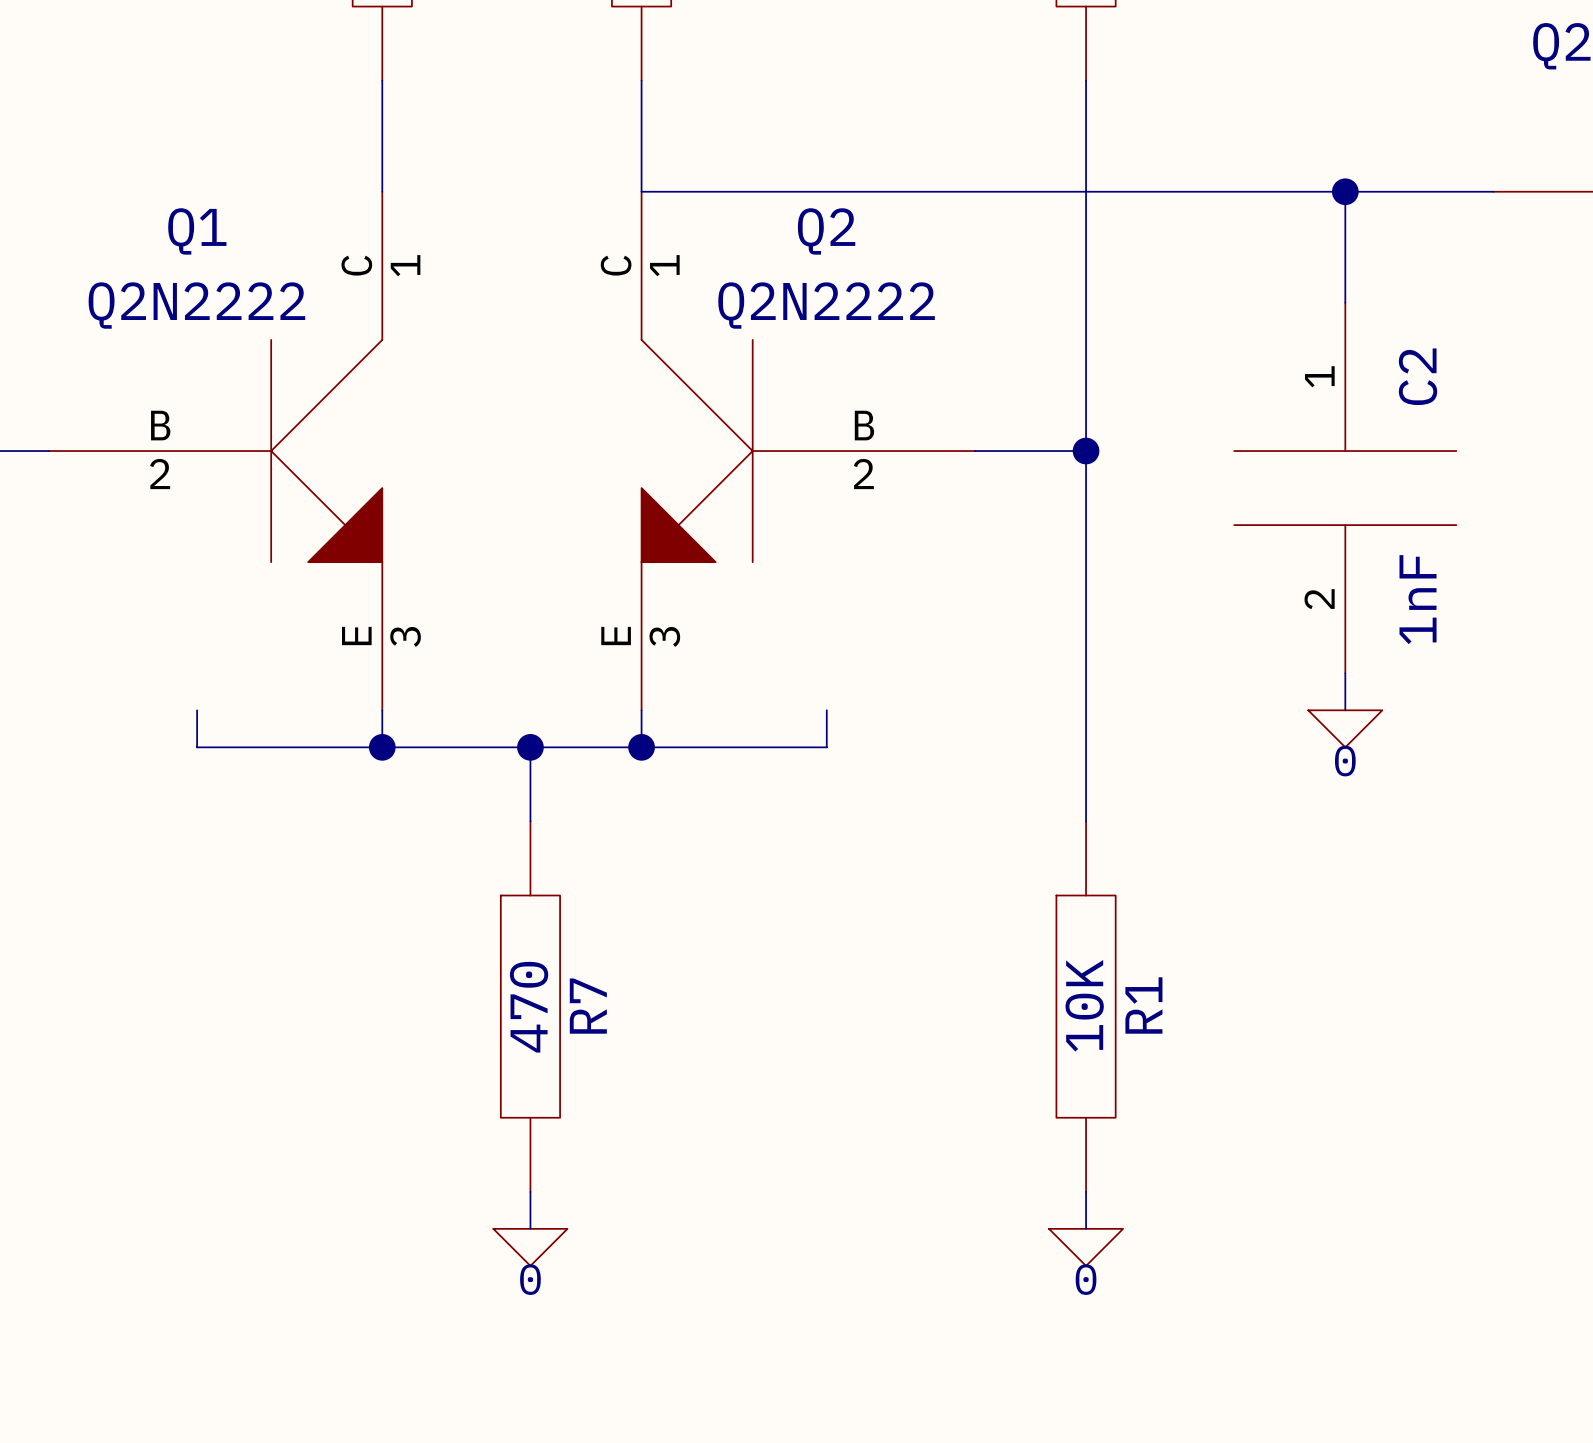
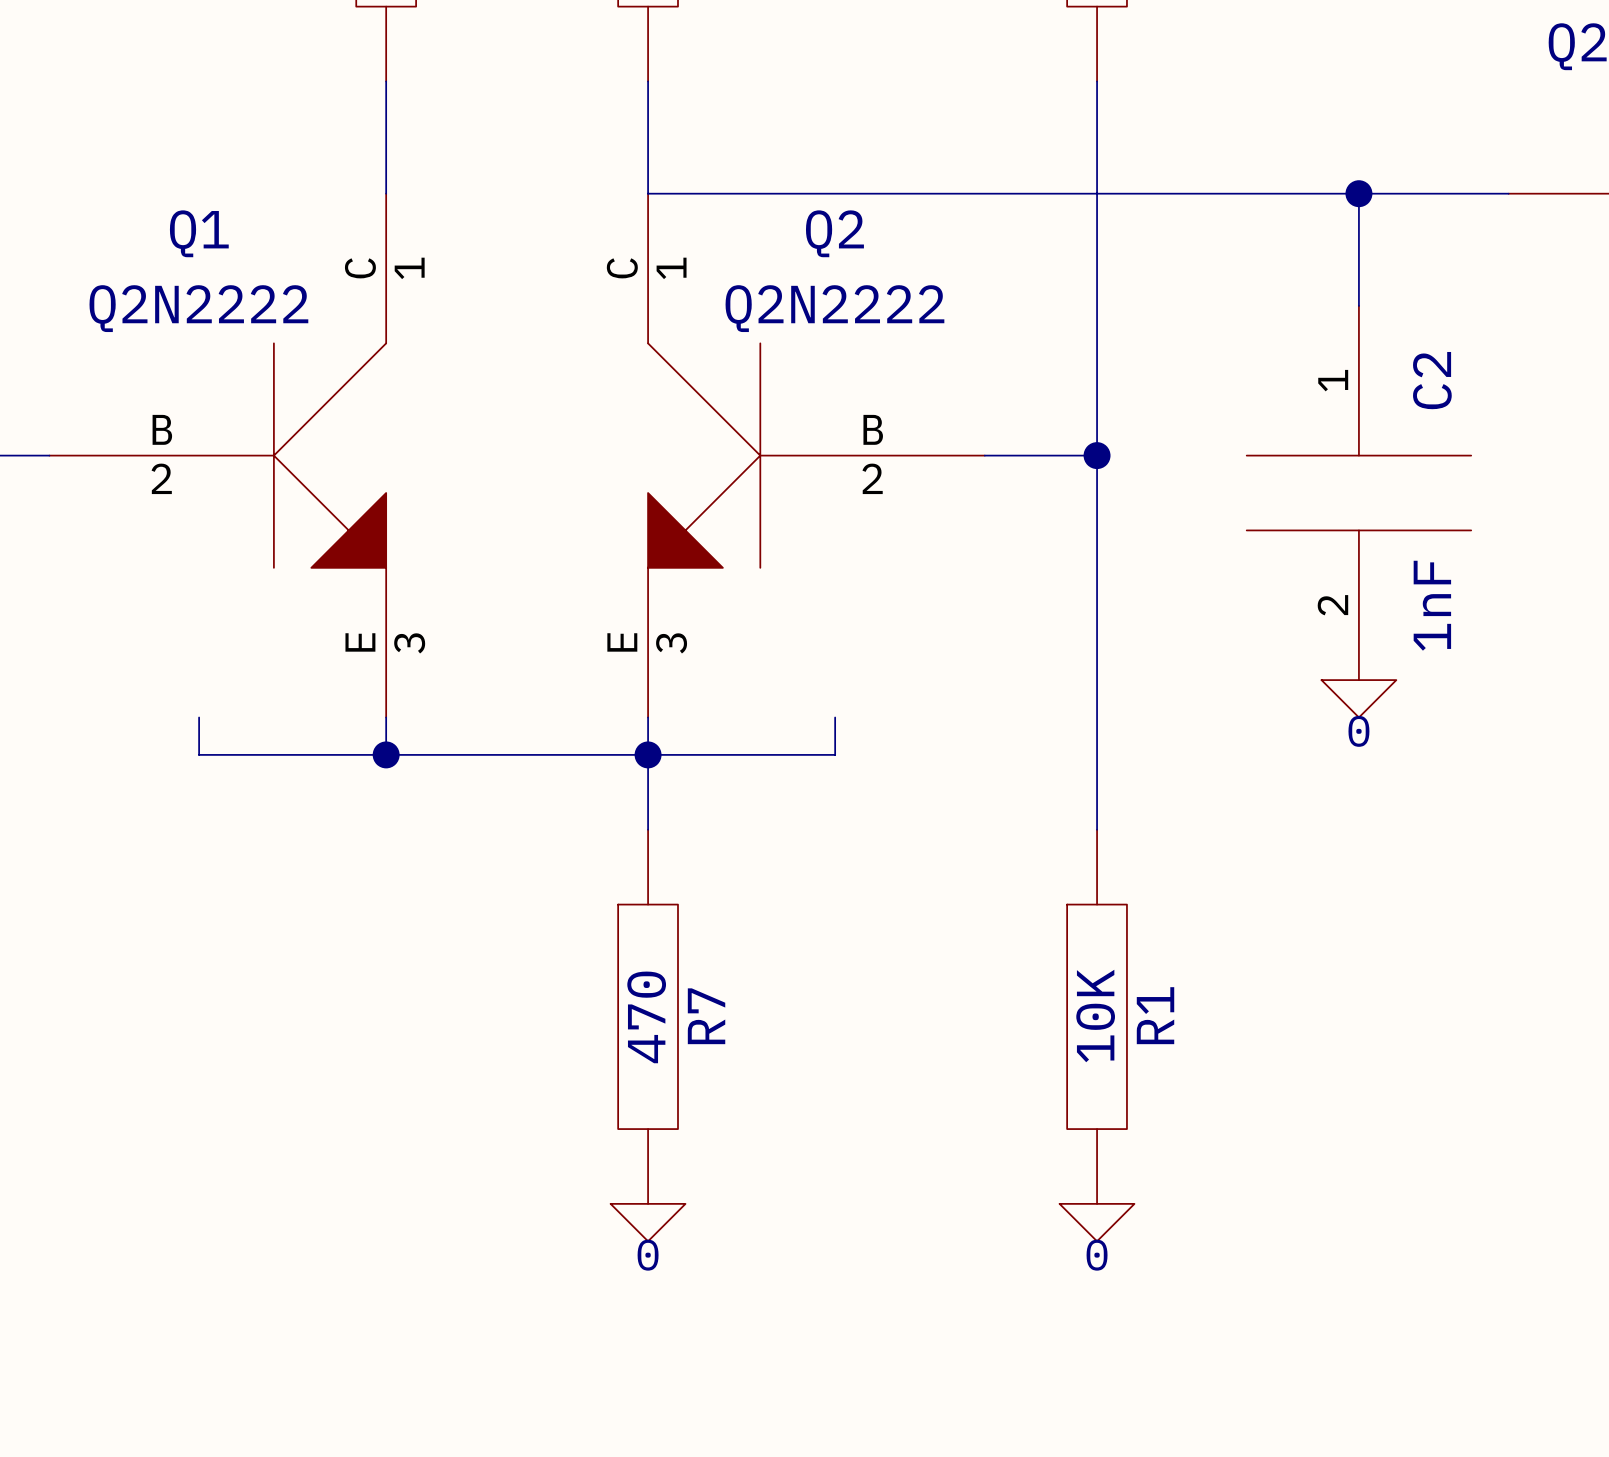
wire: (1345, 673) (1345, 710) -> none
power symbol position: 0 (1345, 728) -> 0 (1358, 698)
wire: (530, 747) (530, 821) -> (648, 754) (648, 829)
junction: (530, 747) -> none
R7 position: (530, 1006) -> (648, 1016)
wire: (530, 1191) (530, 1228) -> none
wire: (1086, 1191) (1086, 1228) -> none
power symbol position: 0 (530, 1247) -> 0 (648, 1222)
power symbol position: 0 (1086, 1247) -> 0 (1097, 1222)

